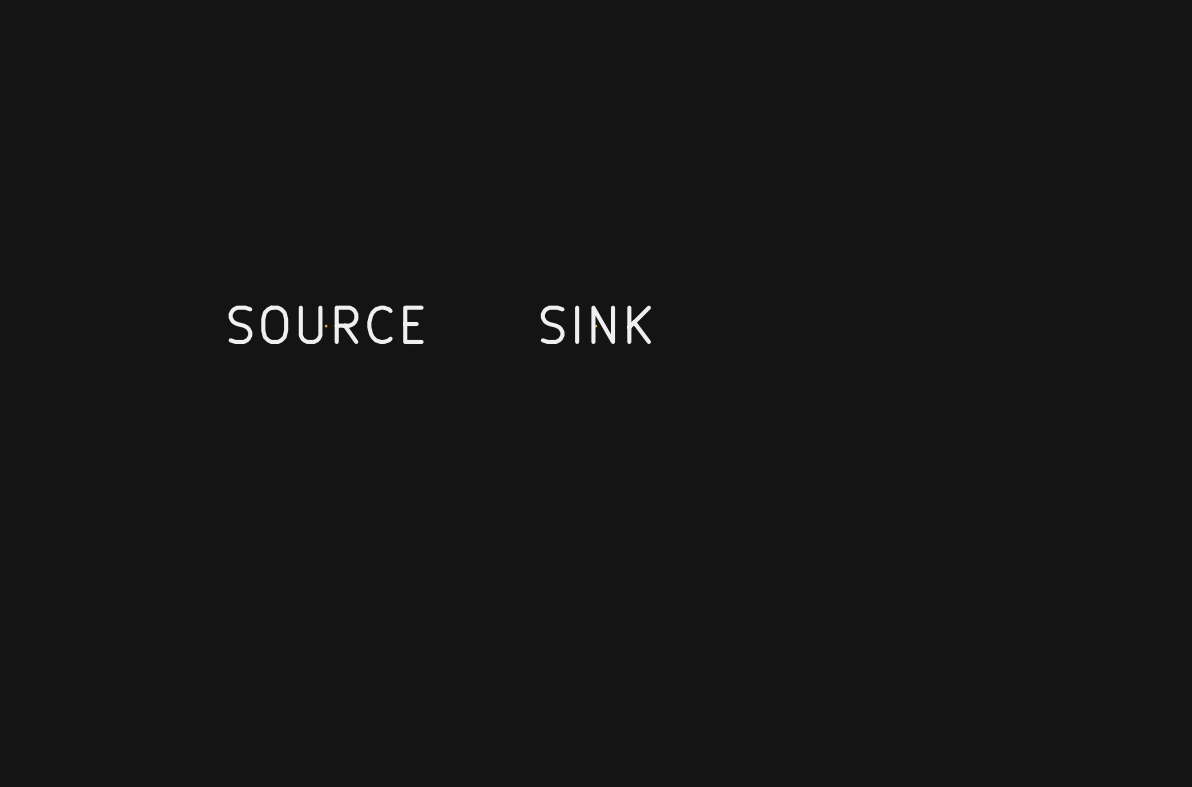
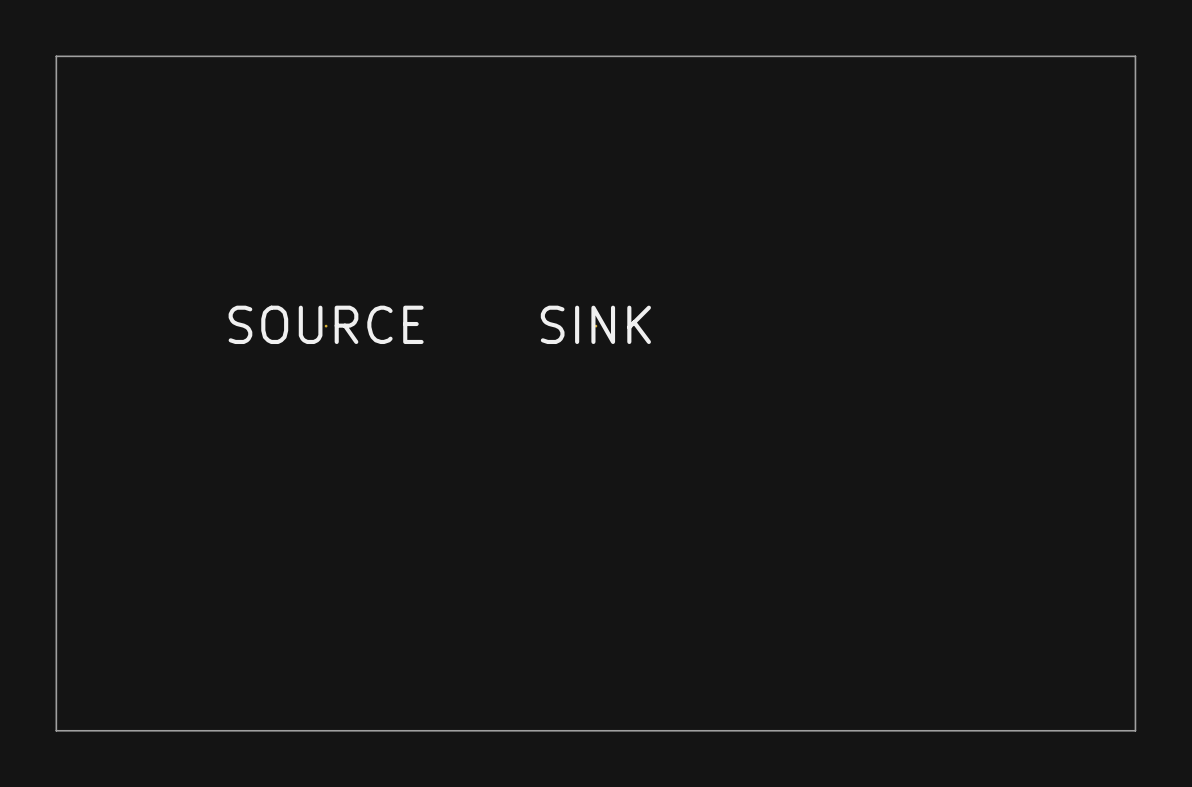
board edge: none -> (56, 56) (1135, 56) (1135, 730) (56, 730) (56, 56)

